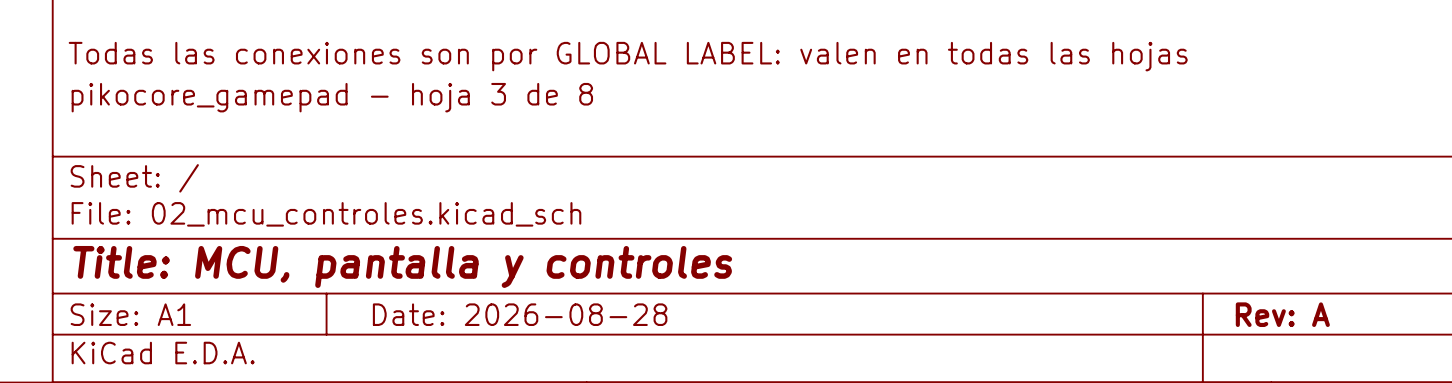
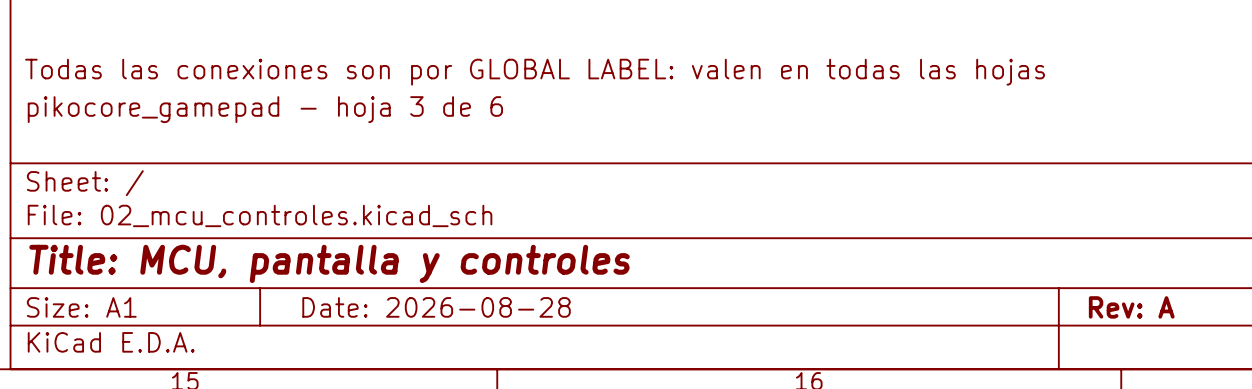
title block: pikocore_gamepad - hoja 3 de 8 (332, 97) -> pikocore_gamepad - hoja 3 de 6 (265, 109)

